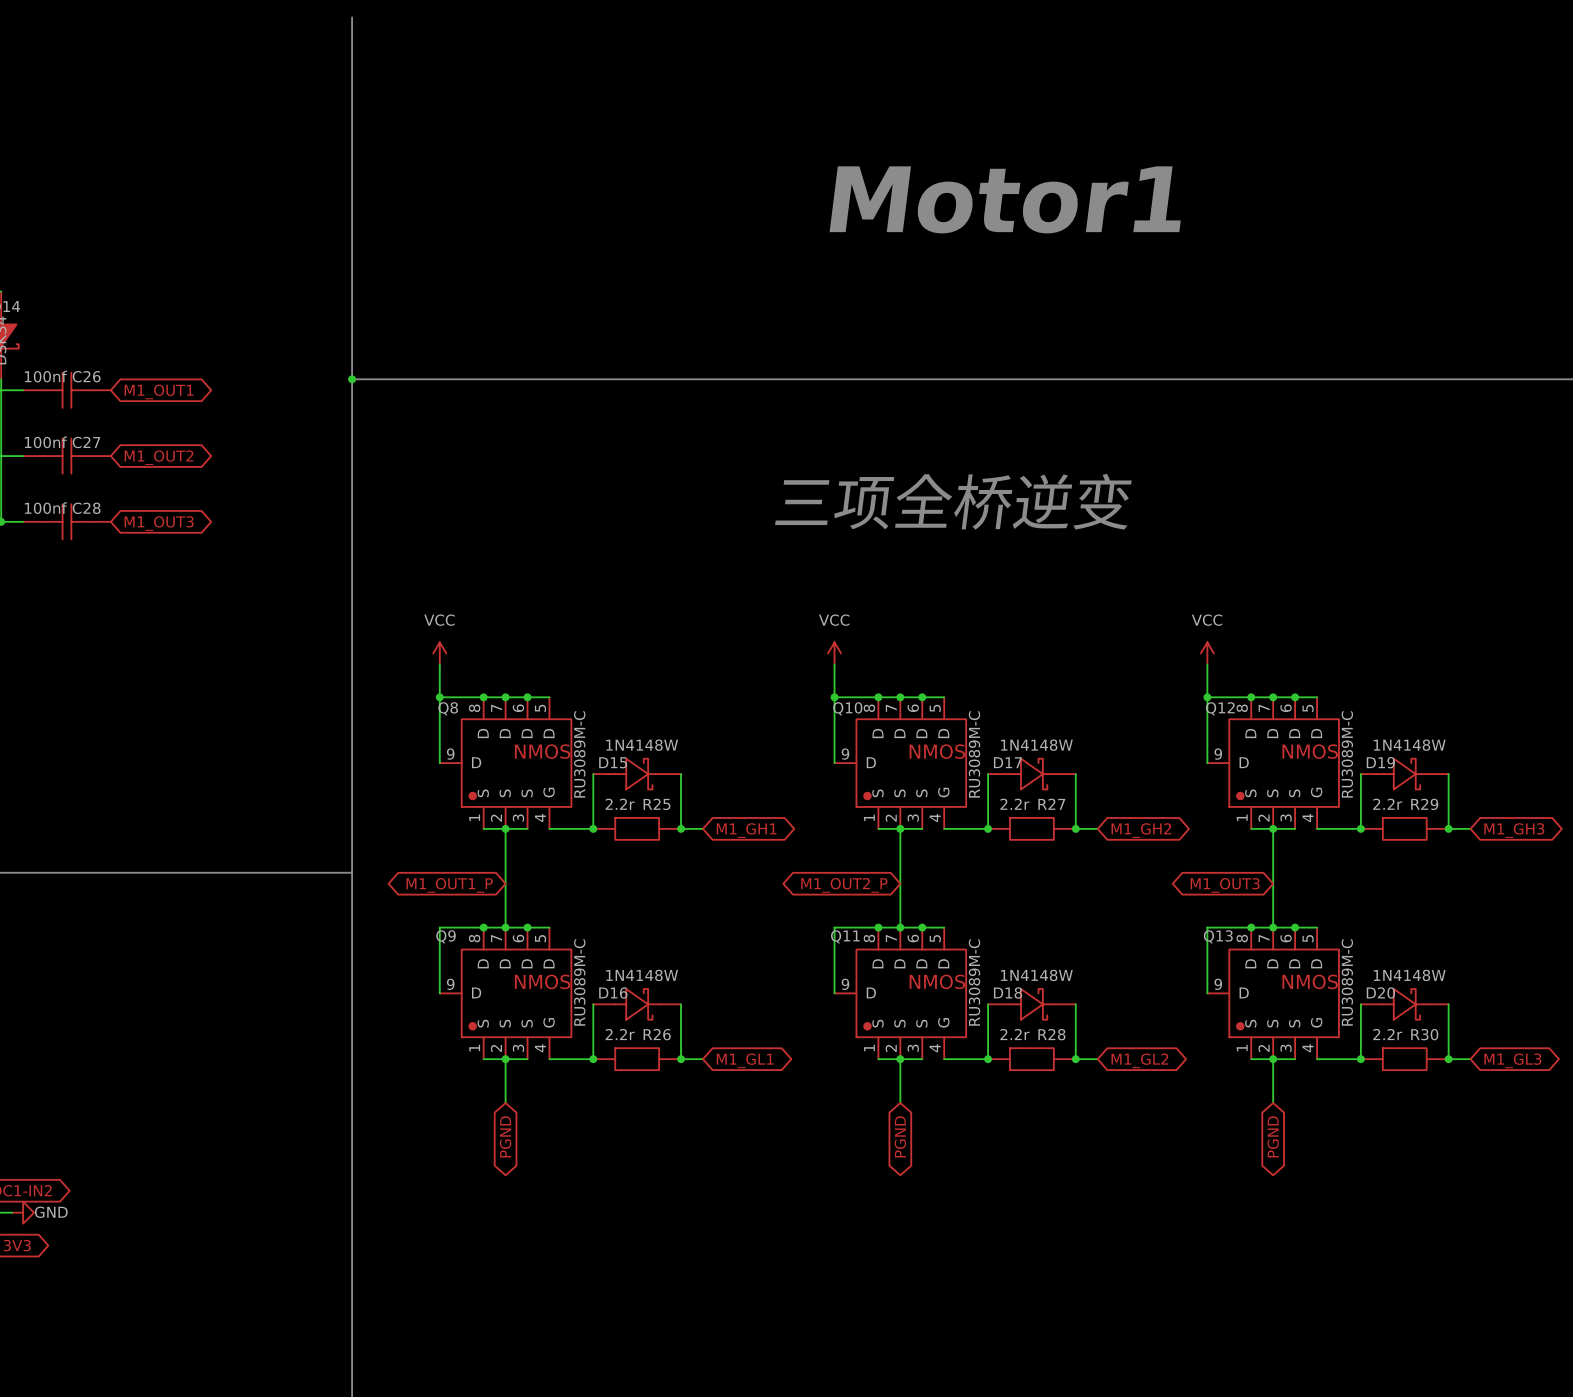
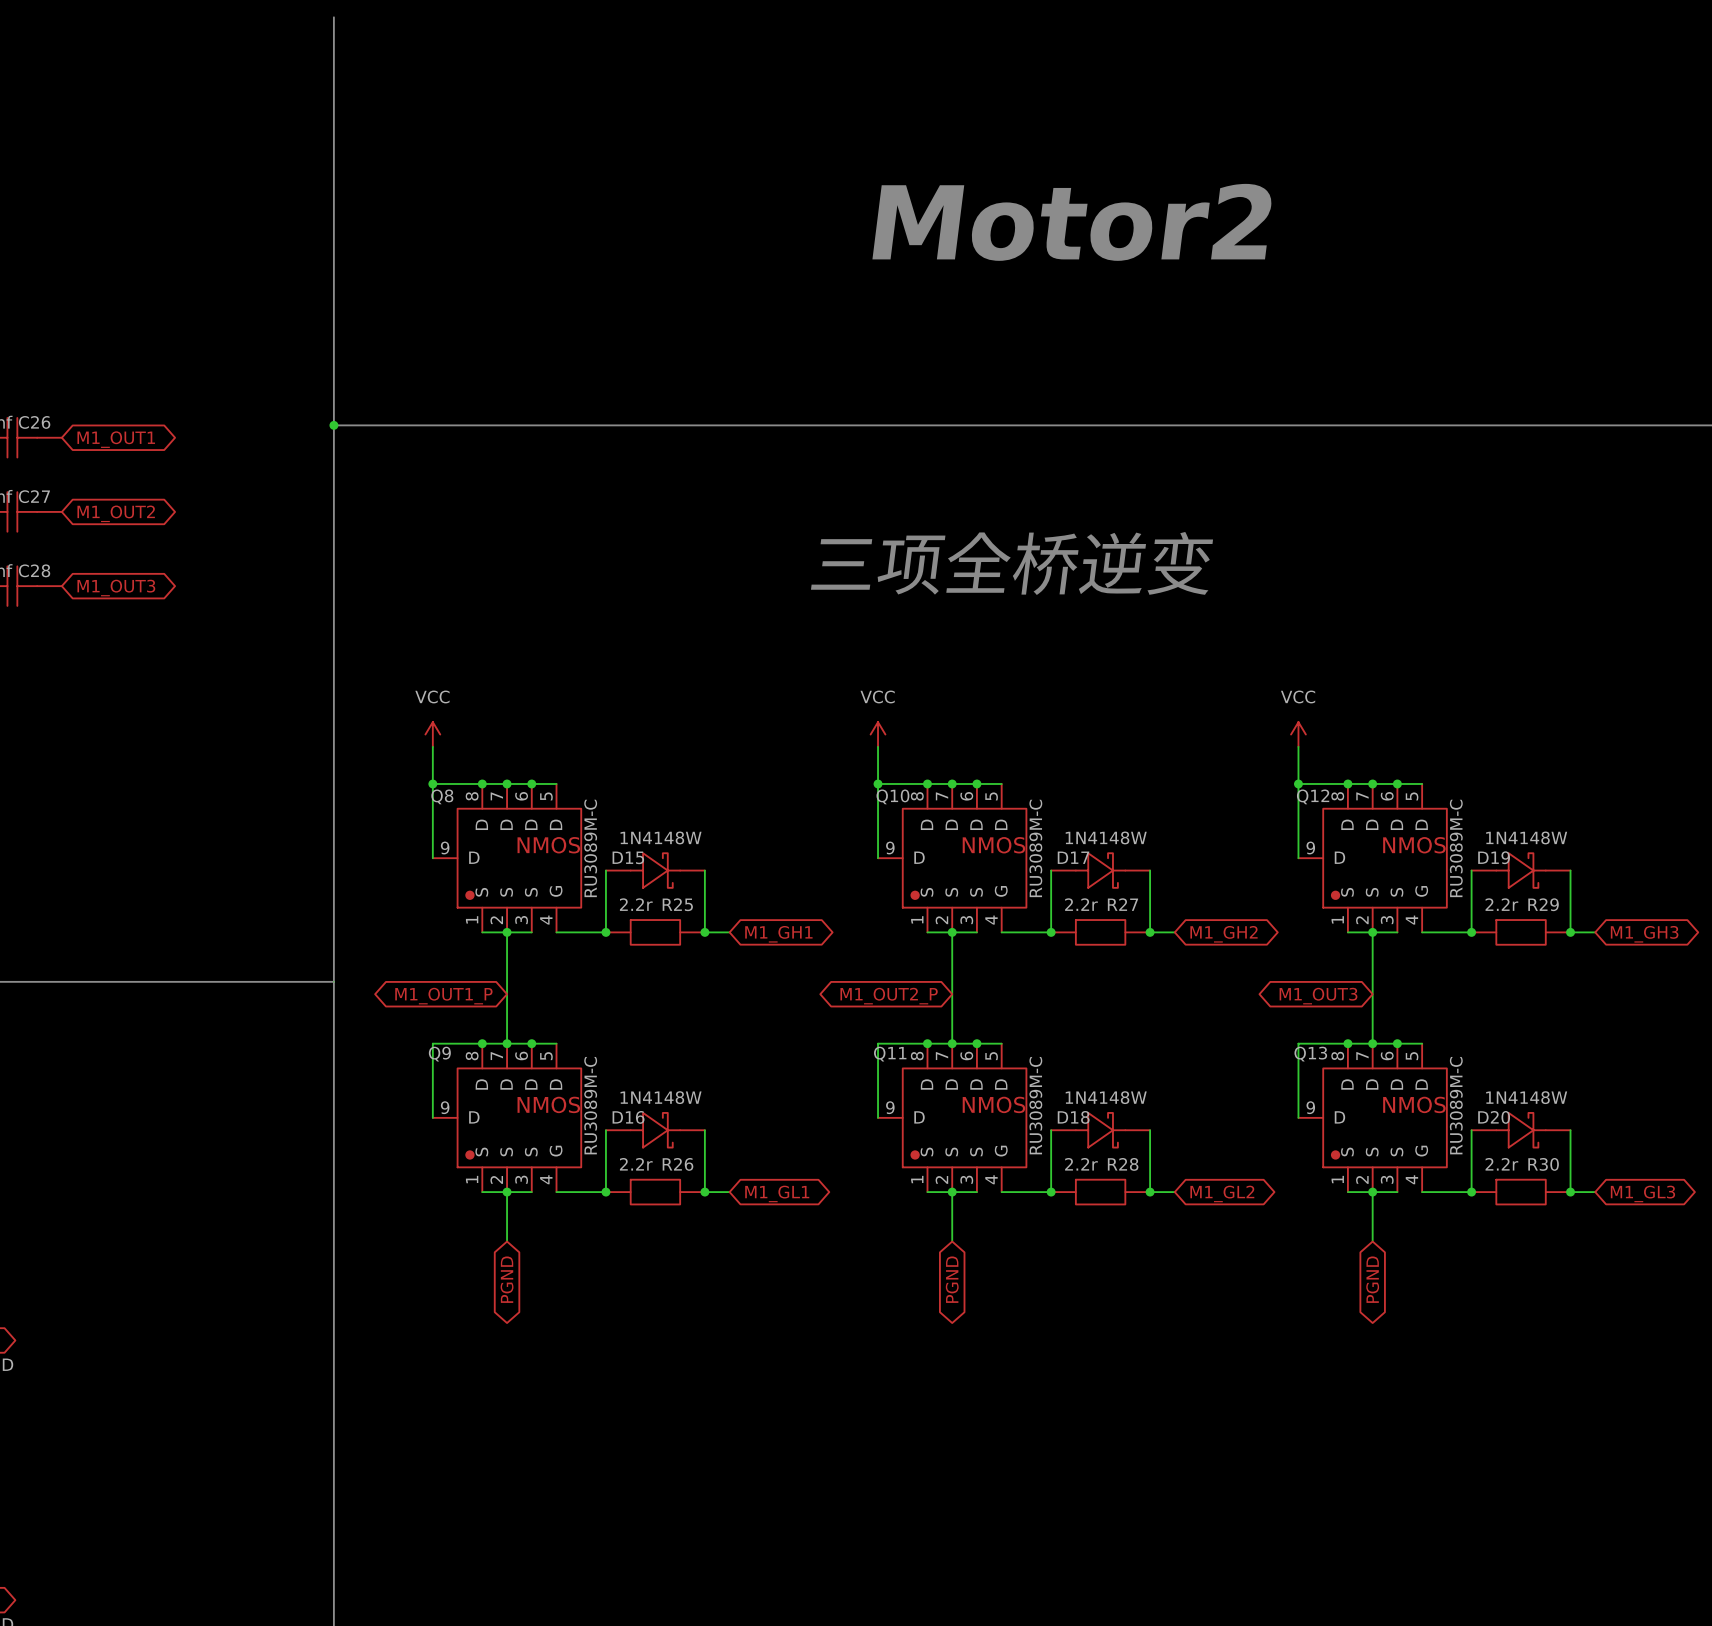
text: Motor1 (1005, 199) -> Motor2 (1072, 222)

